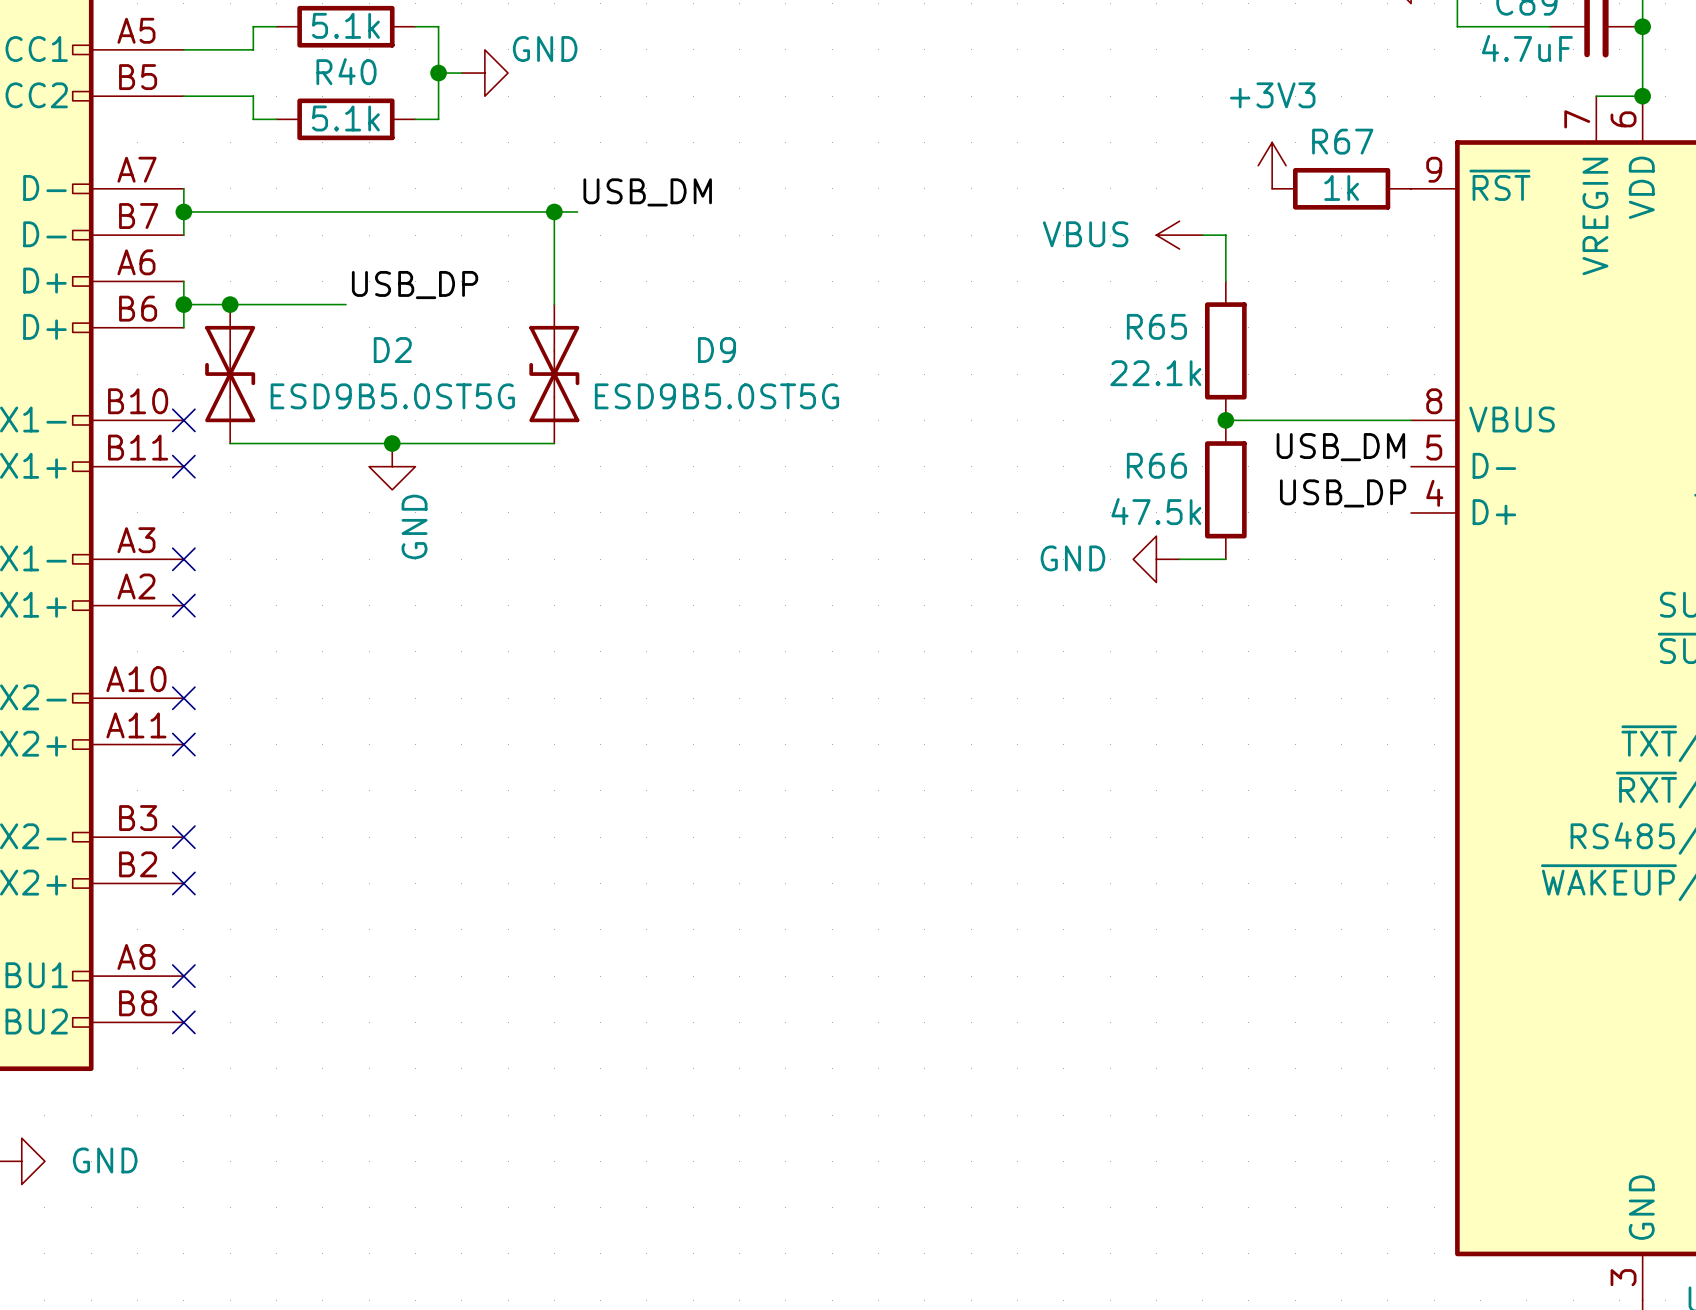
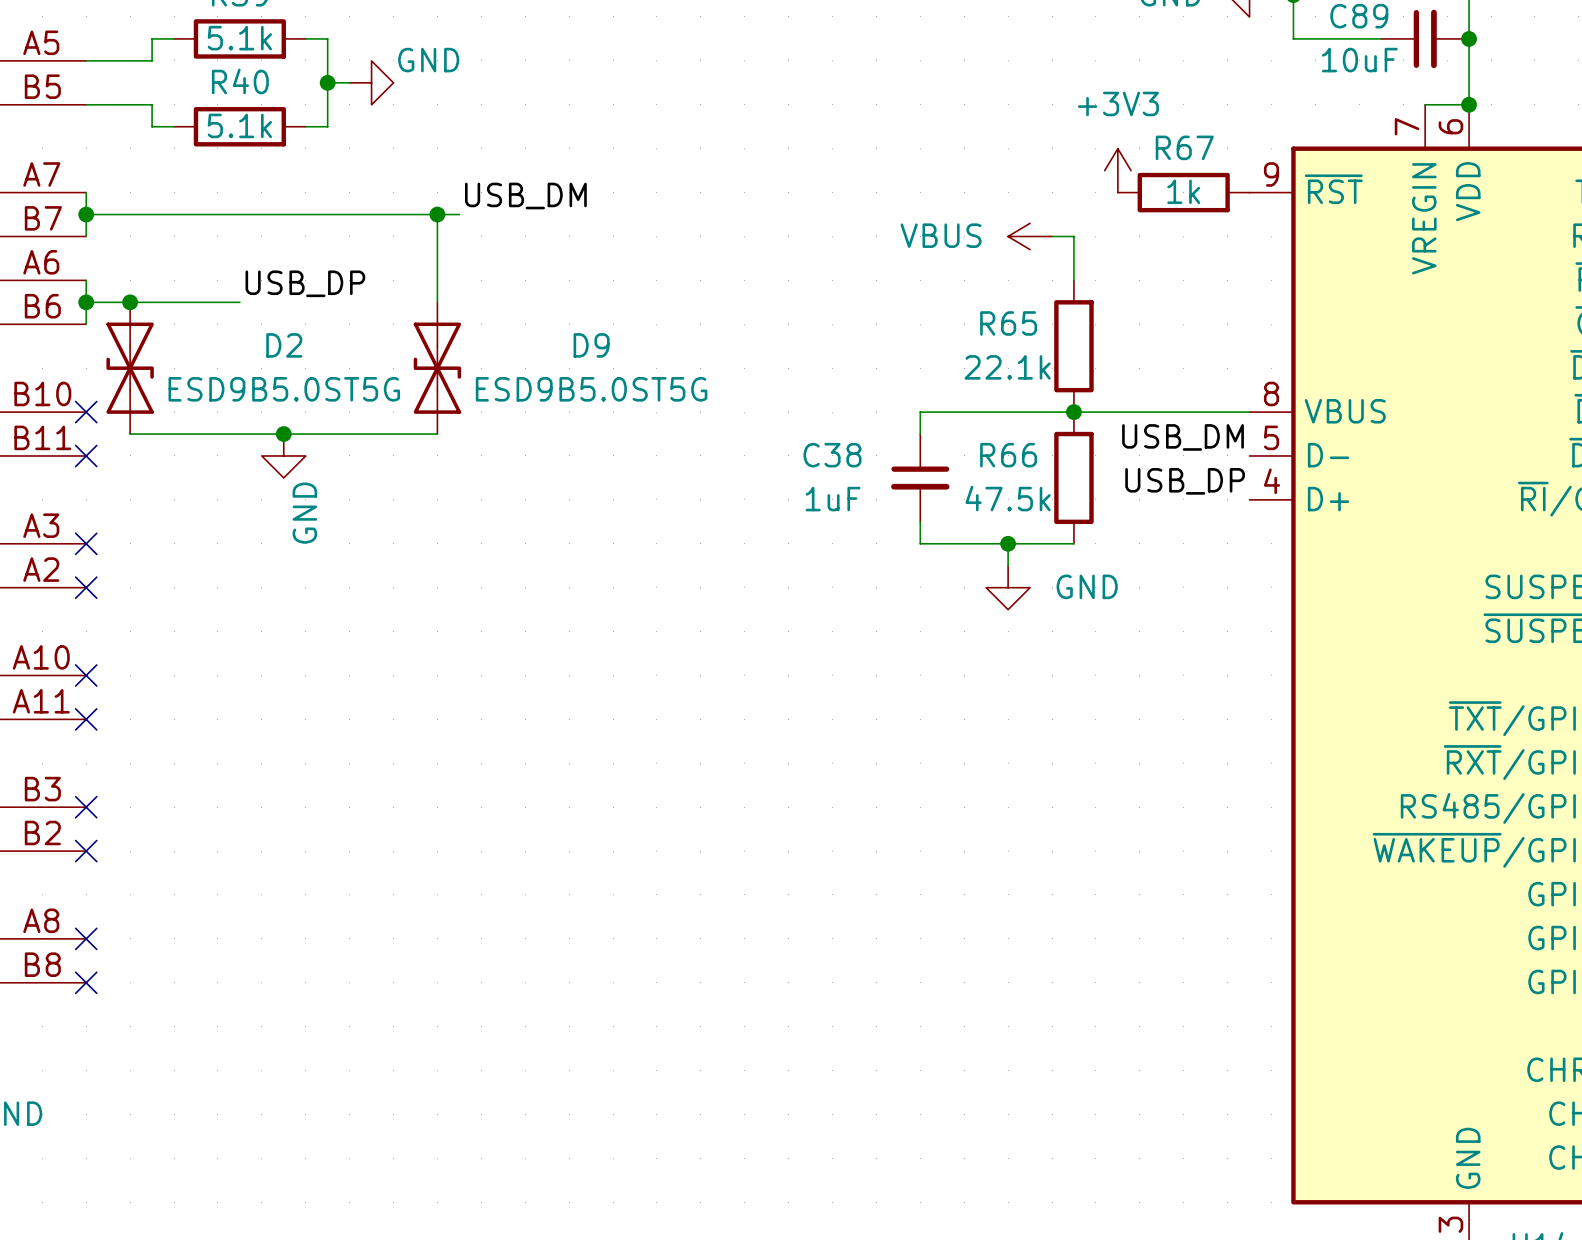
C89 value: 4.7uF (1527, 48) -> 10uF (1359, 60)
wire: none -> (1073, 412) (920, 412) (920, 434)
C38: none -> 1uF (920, 477)
wire: none -> (920, 521) (920, 543) (1030, 543)
power symbol text position: GND (1072, 558) -> GND (1087, 586)
power symbol rotation: 0° (1156, 559) -> 90° counterclockwise (1008, 587)
power symbol position: GND (1156, 559) -> GND (1008, 587)
junction: none -> (1008, 543)

